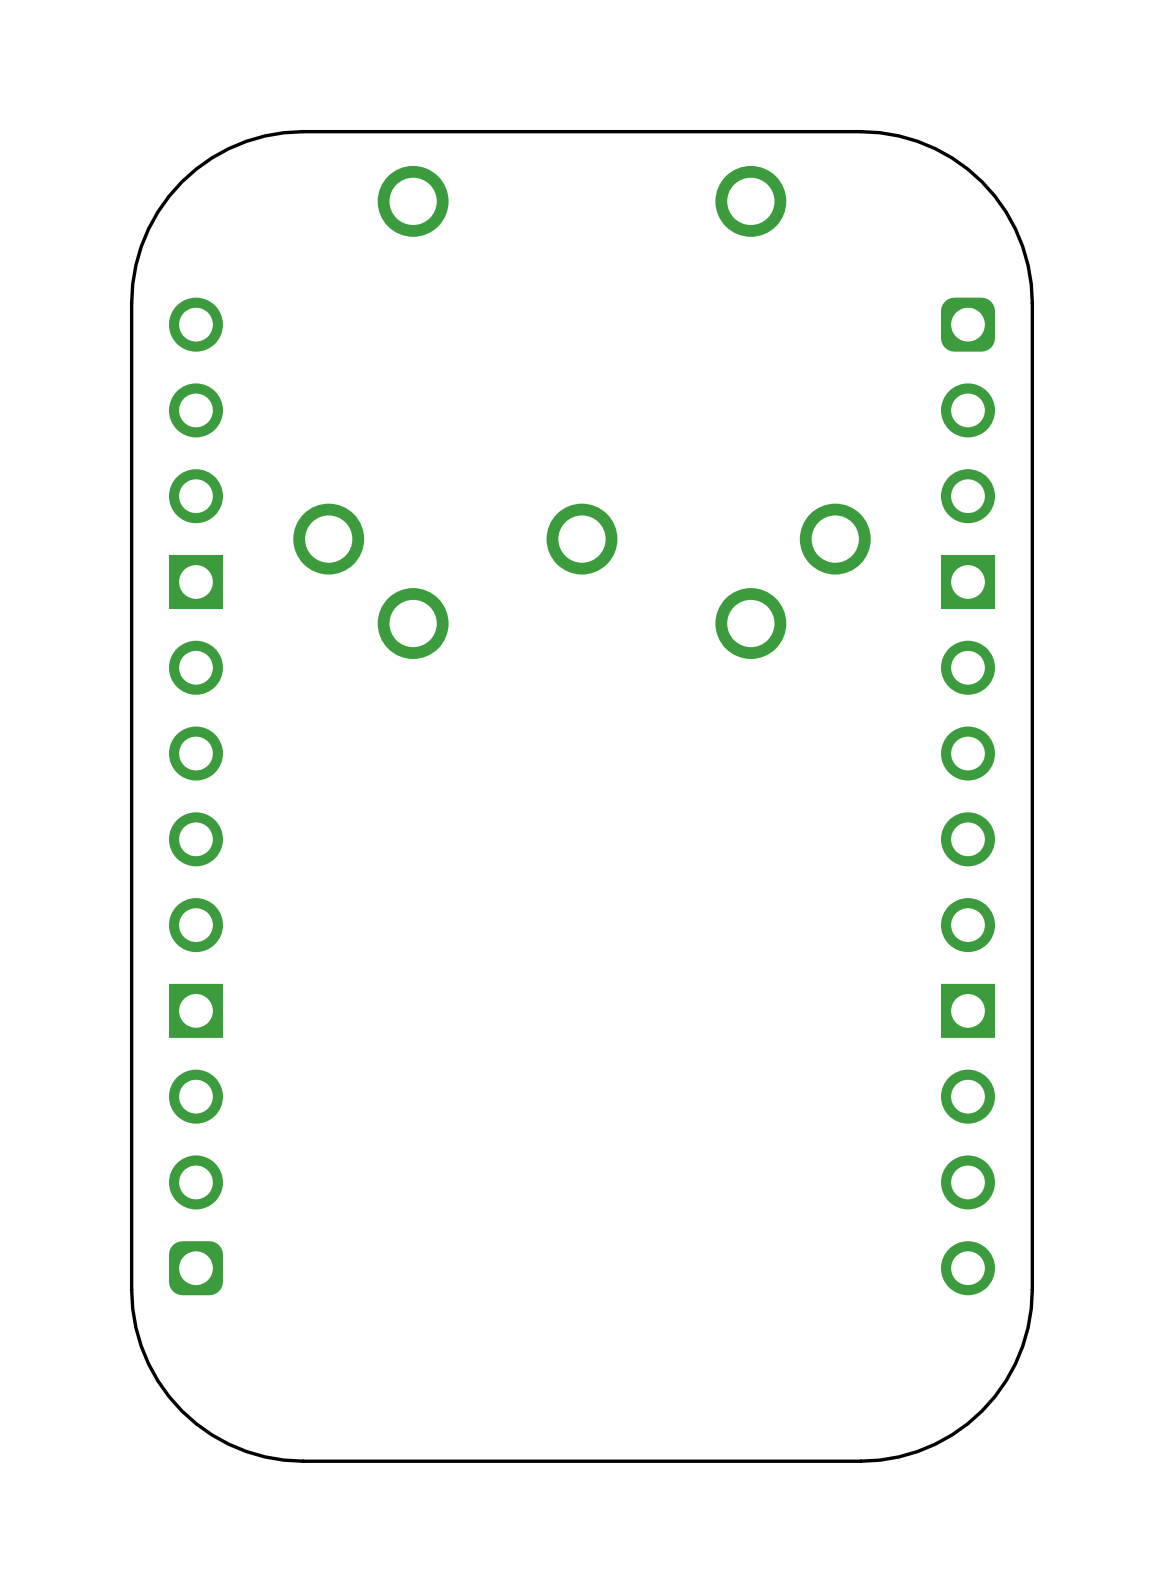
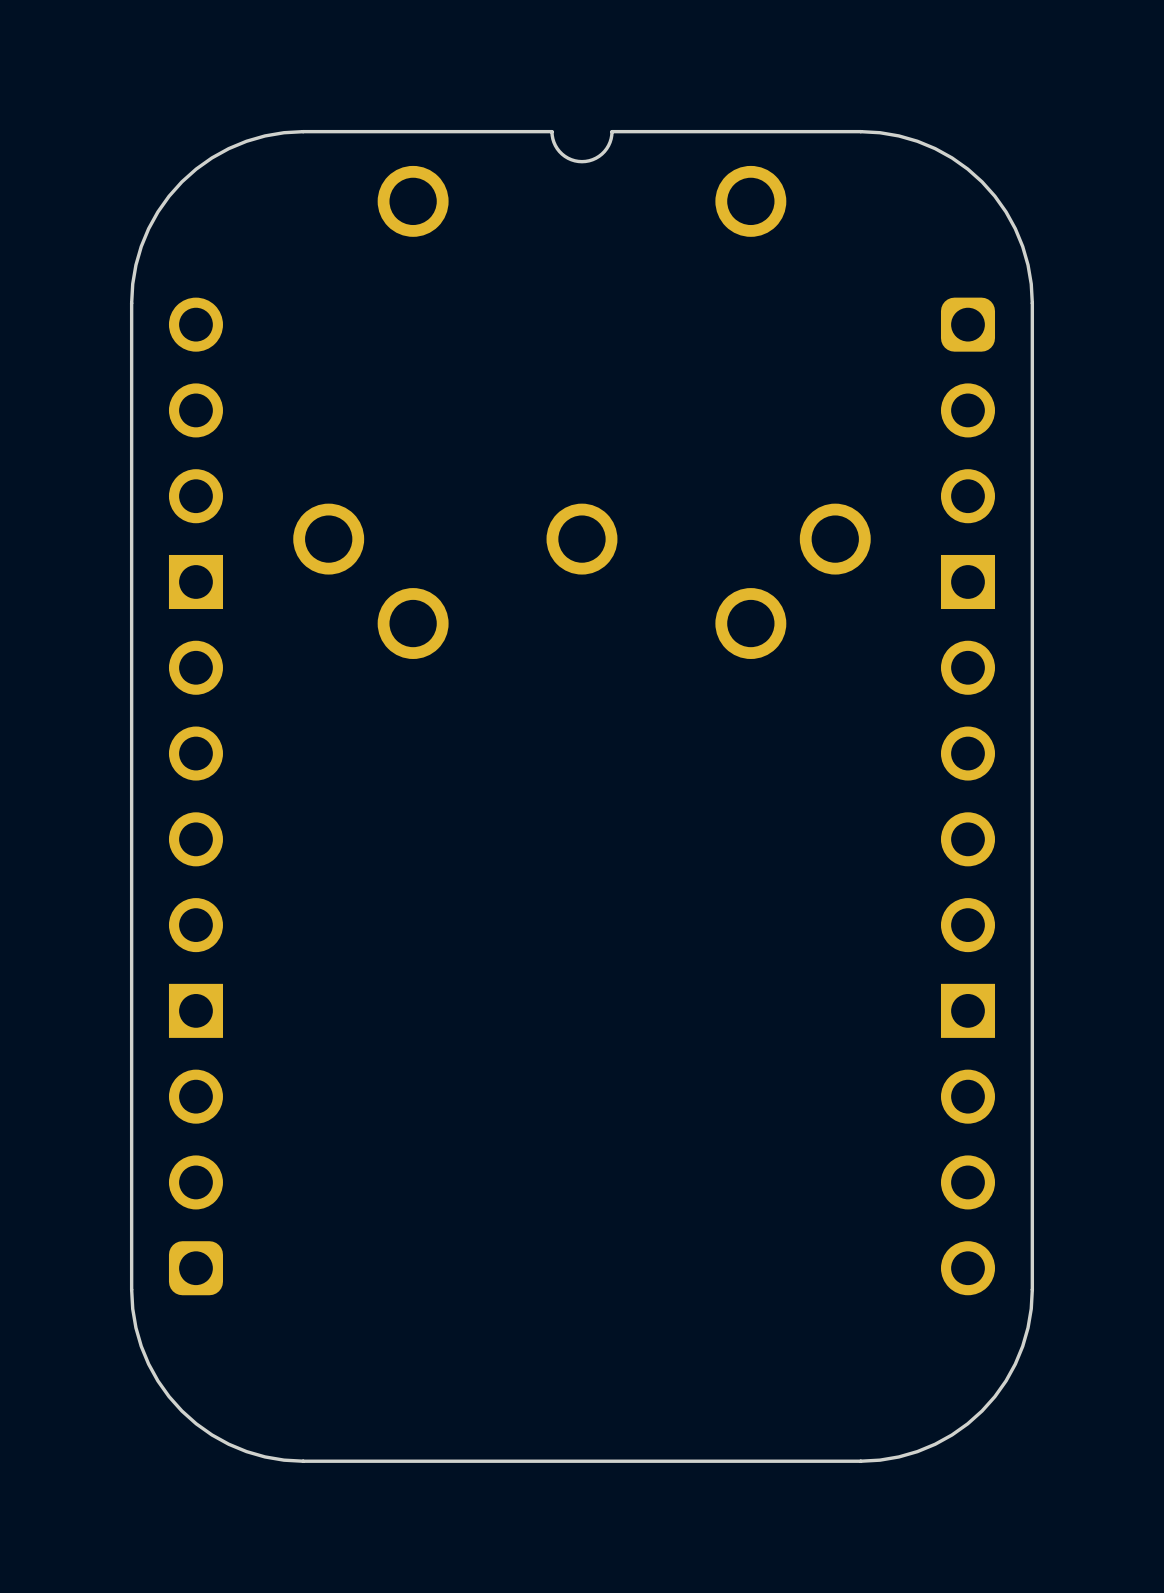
part footprint: [129, 129, 1035, 1463] -> [129, 129, 1035, 1463]

